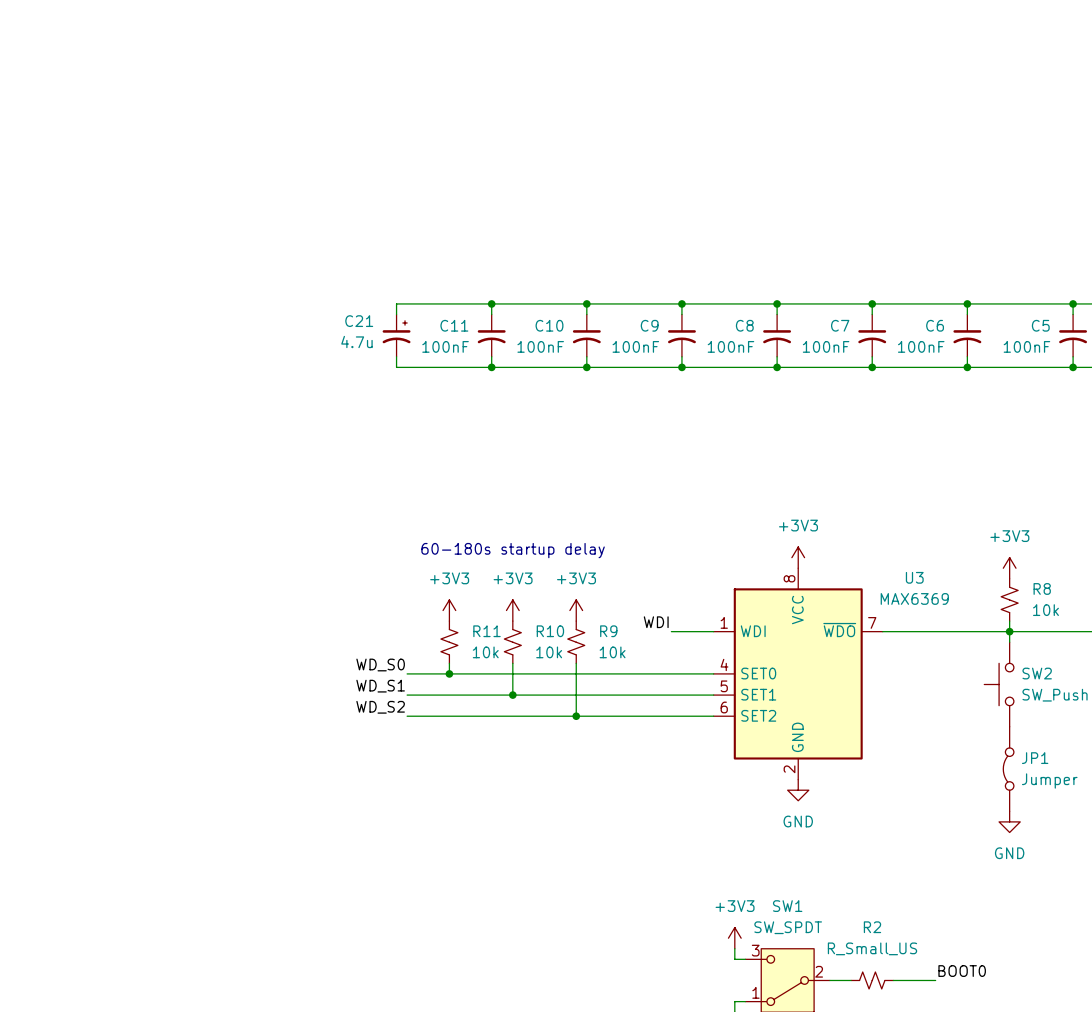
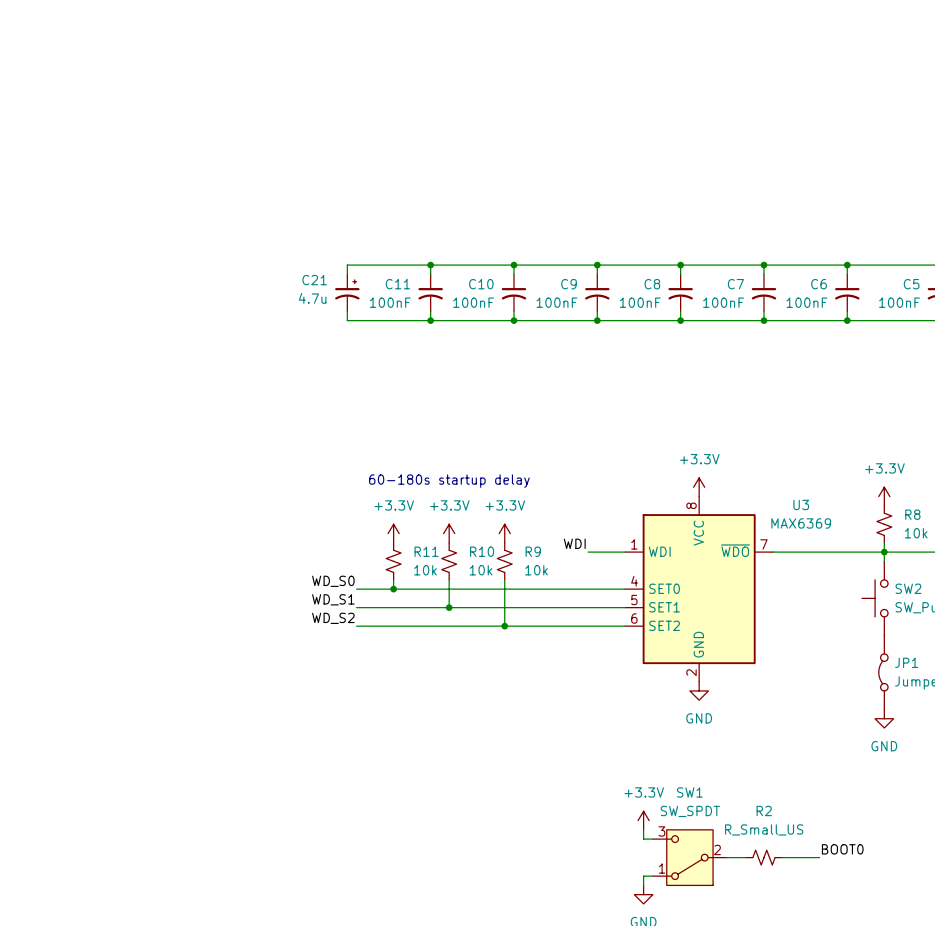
power symbol: +3V3 (798, 557) -> +3.3V (699, 487)
power symbol: +3V3 (1009, 568) -> +3.3V (884, 496)
power symbol: +3V3 (449, 610) -> +3.3V (393, 533)
power symbol: +3V3 (512, 610) -> +3.3V (449, 533)
power symbol: +3V3 (576, 610) -> +3.3V (504, 533)
power symbol: +3V3 (734, 938) -> +3.3V (643, 820)

